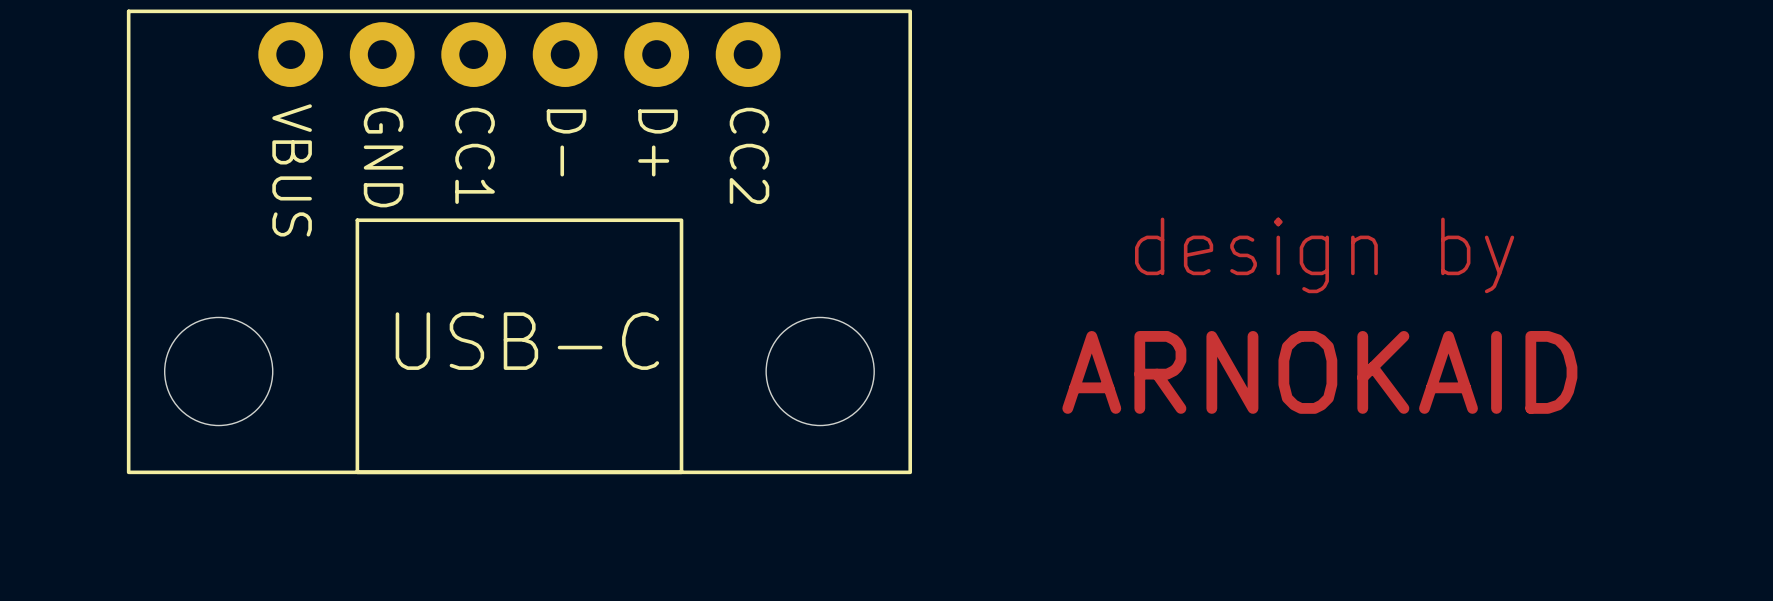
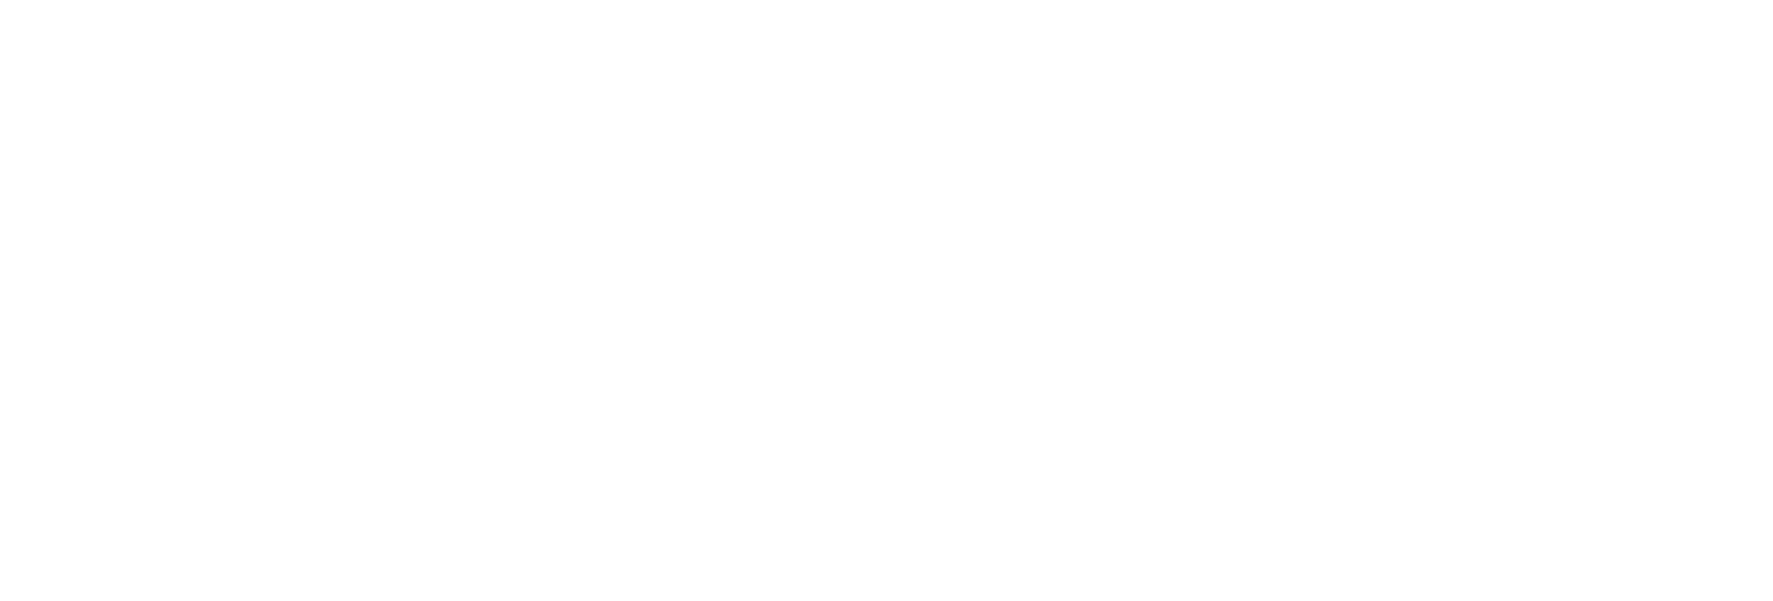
part: (519, 241) -> none
text: design by (1324, 255) -> none
text: ARNOKAID (1319, 372) -> none

